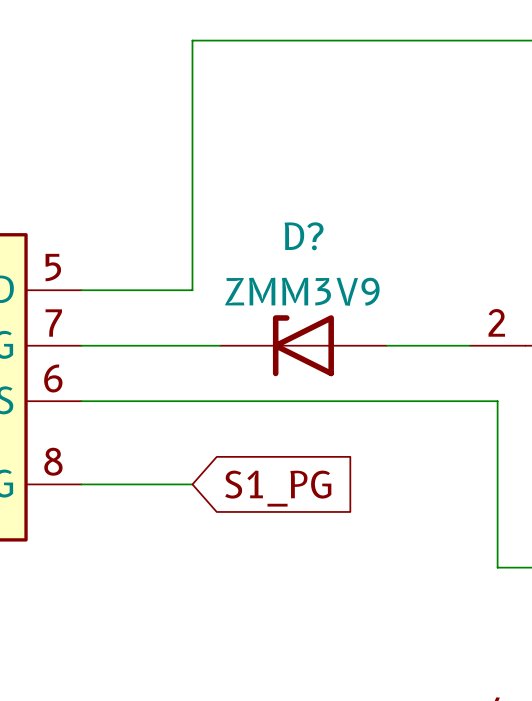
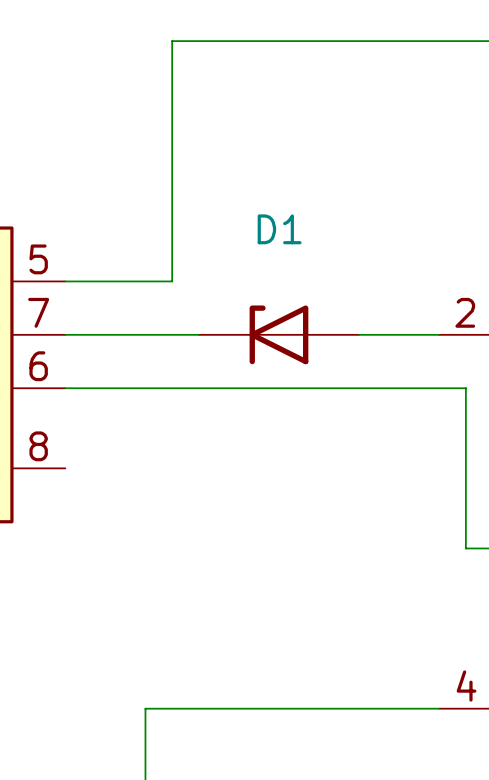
D? name: D? (304, 236) -> D1 (279, 229)
D? value: ZMM3V9 (302, 291) -> none
wire: (81, 484) (192, 484) -> none
global label: S1_PG (278, 488) -> none

